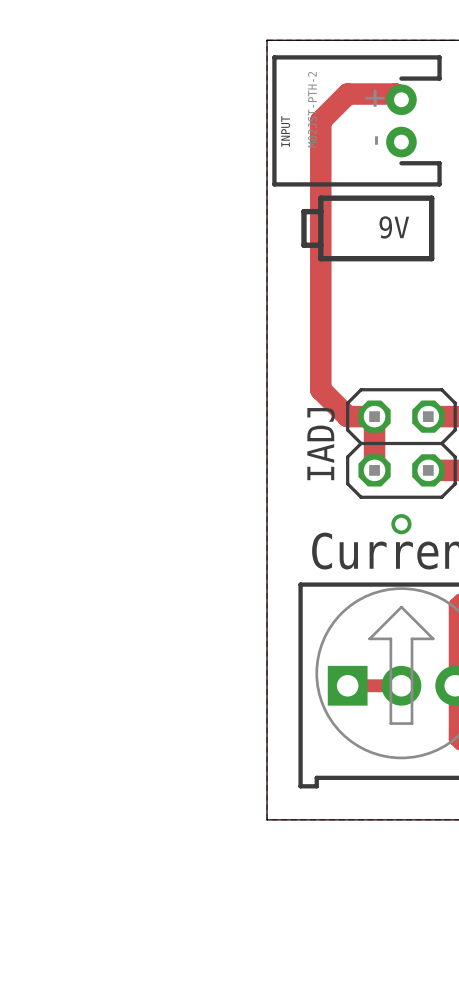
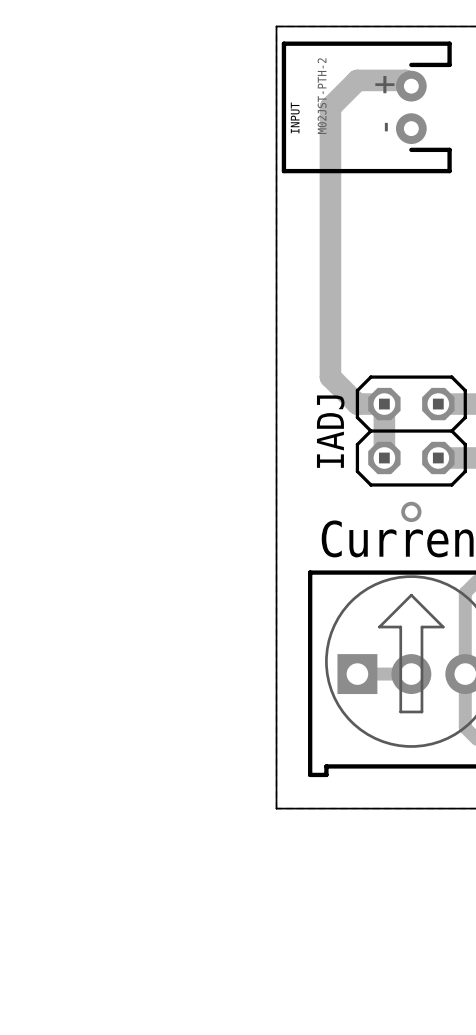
drawing: [301, 195, 435, 262] -> none

